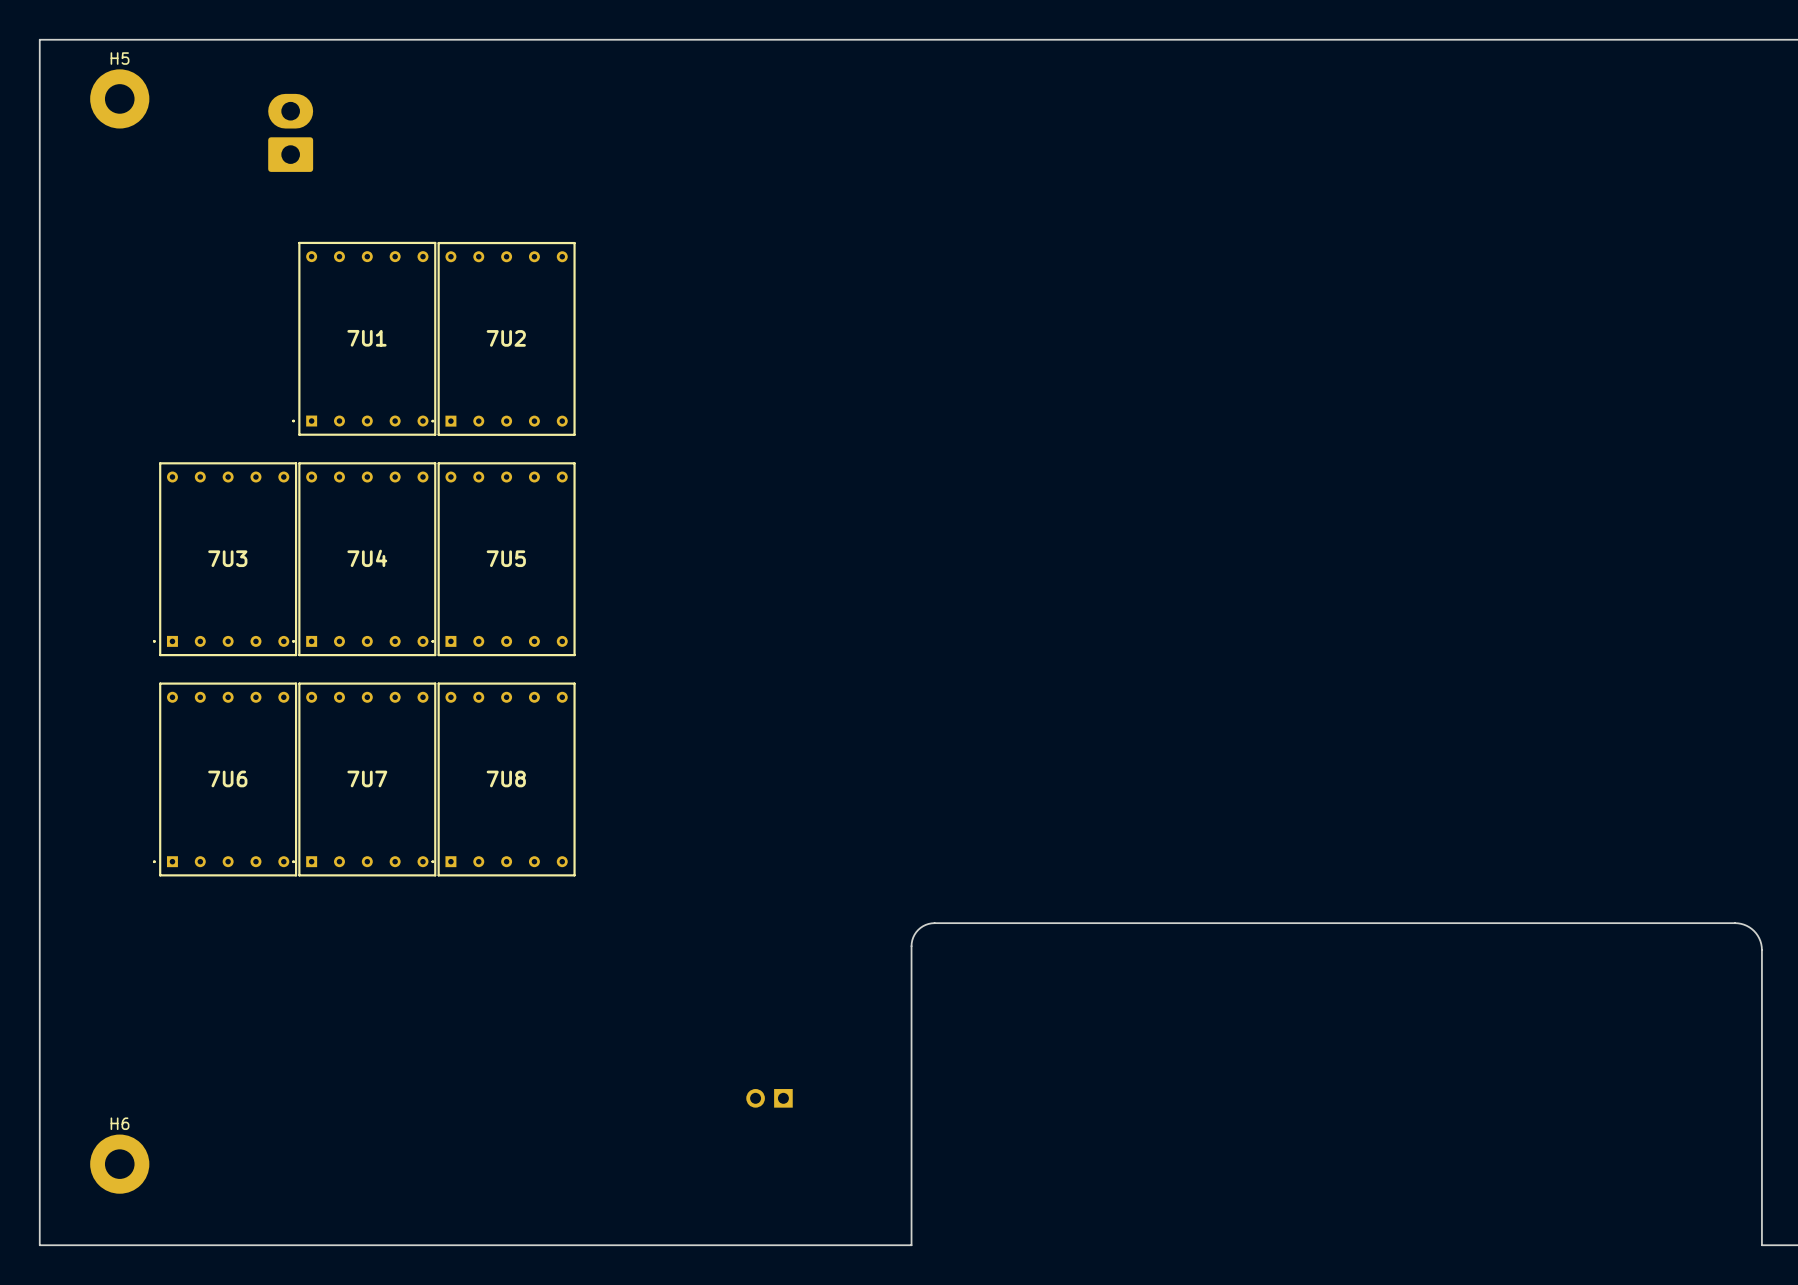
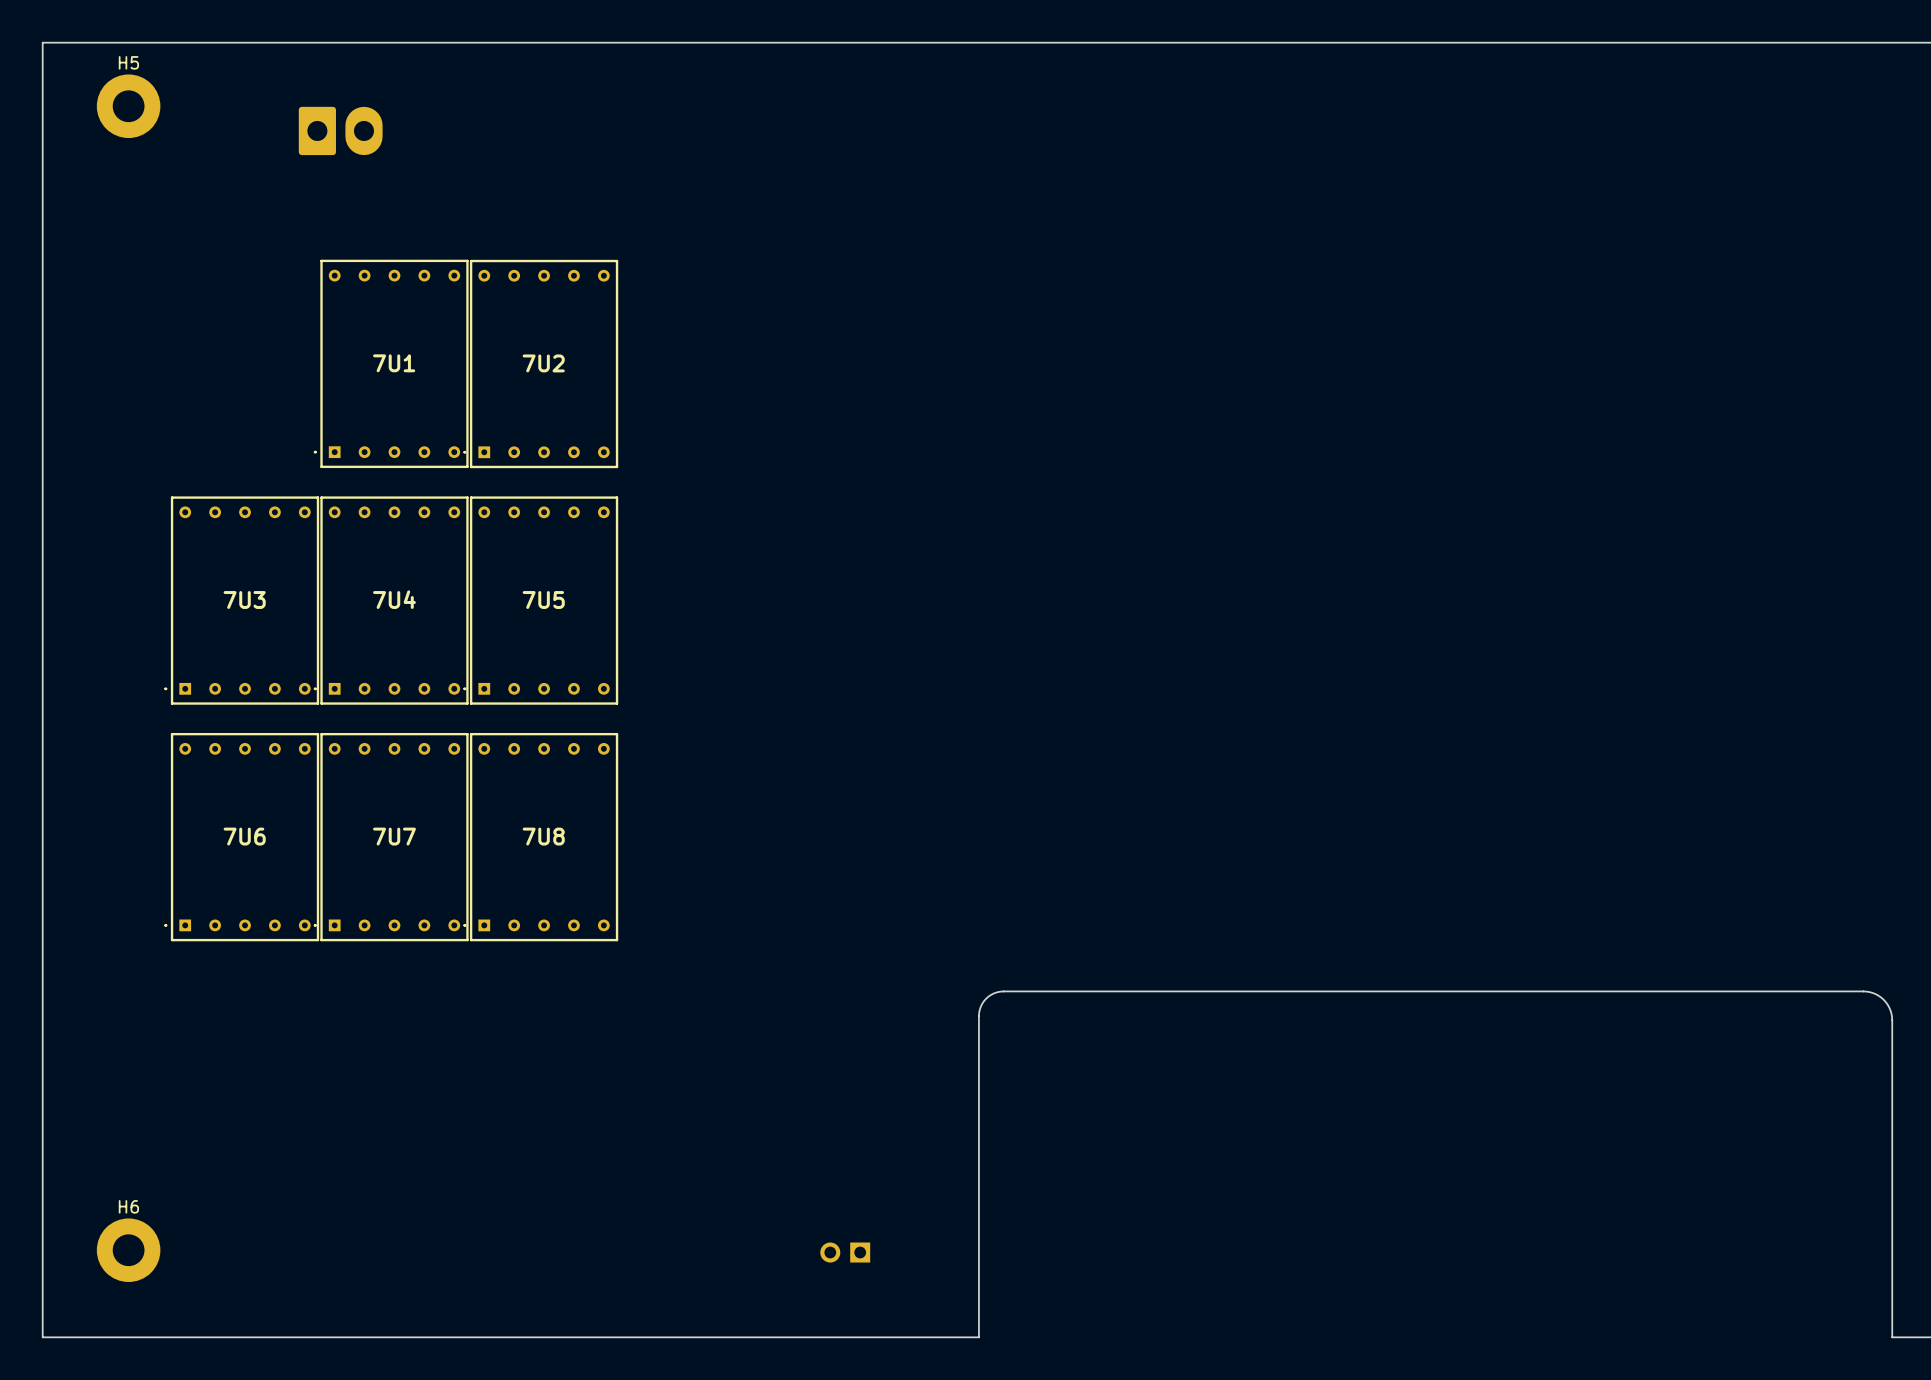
part rotation: 0° (290, 132) -> 90° clockwise (340, 130)
part position: (769, 1098) -> (845, 1252)

